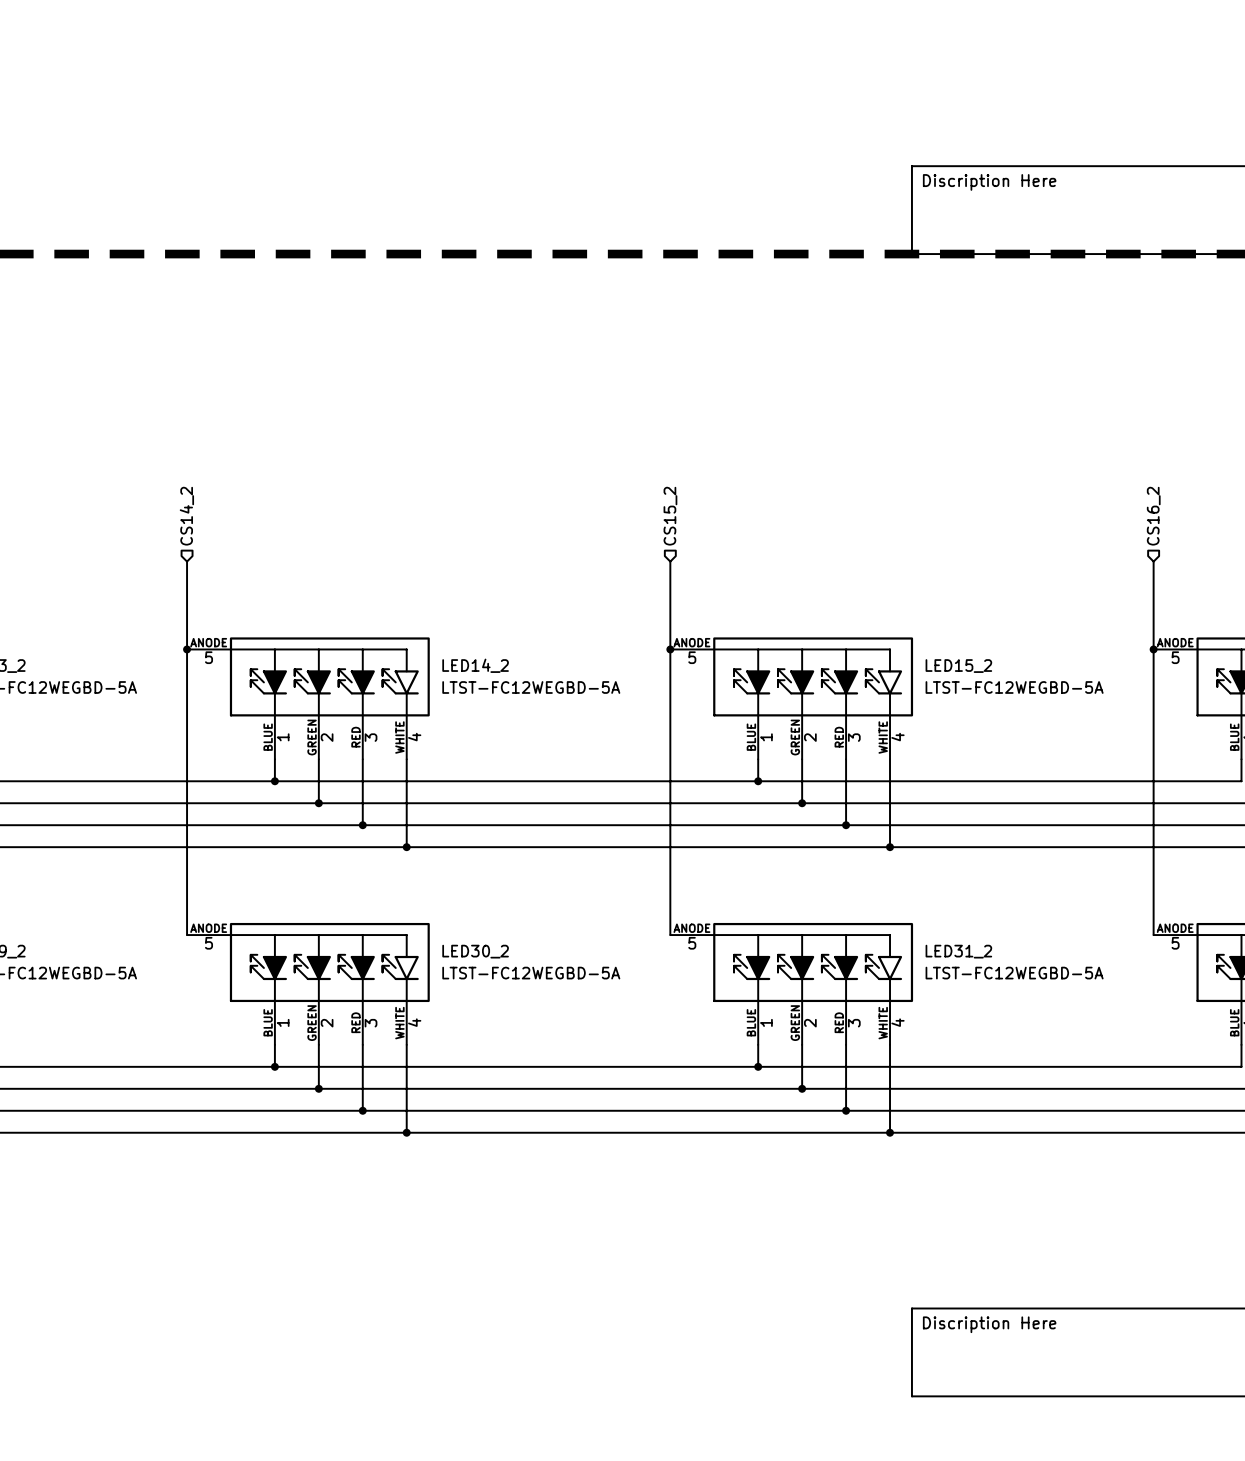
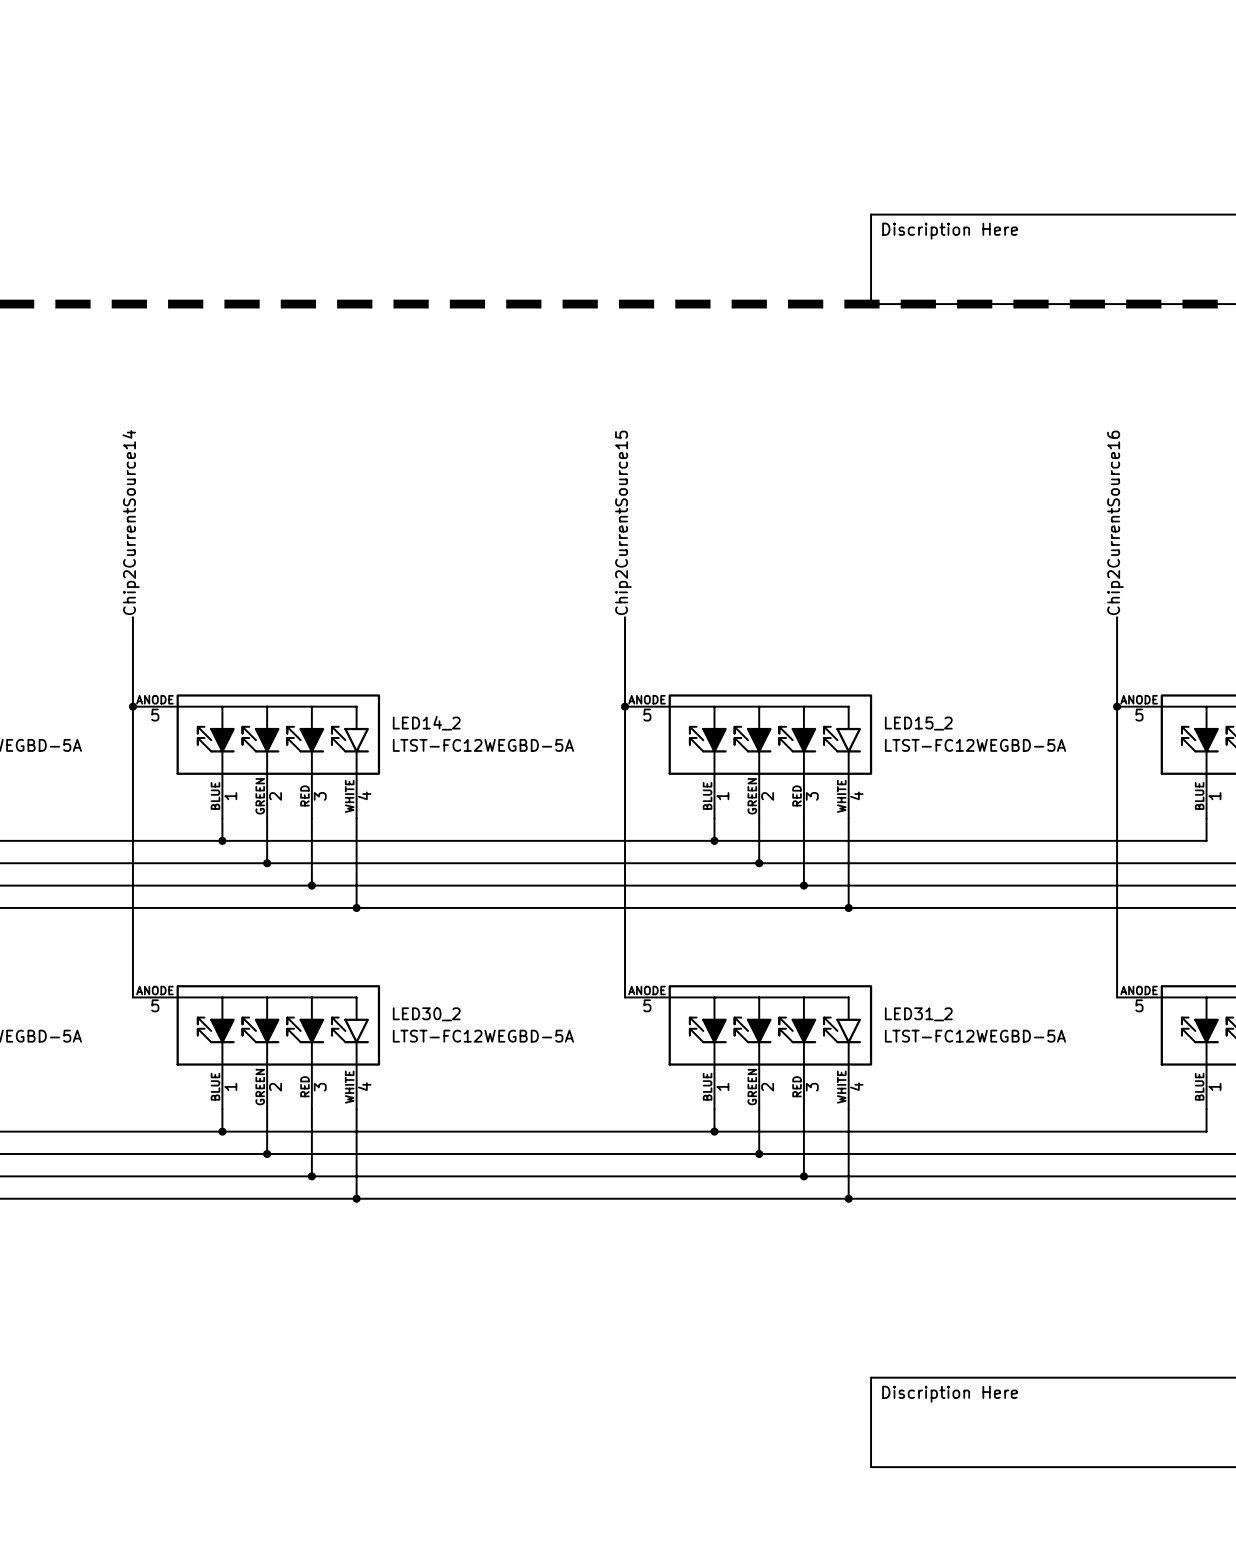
label: none -> Chip2CurrentSource14 (131, 522)
label: none -> Chip2CurrentSource15 (623, 522)
label: none -> Chip2CurrentSource16 (1115, 522)
hierarchical label: CS14_2 (186, 516) -> none
hierarchical label: CS15_2 (670, 516) -> none
hierarchical label: CS16_2 (1153, 516) -> none

